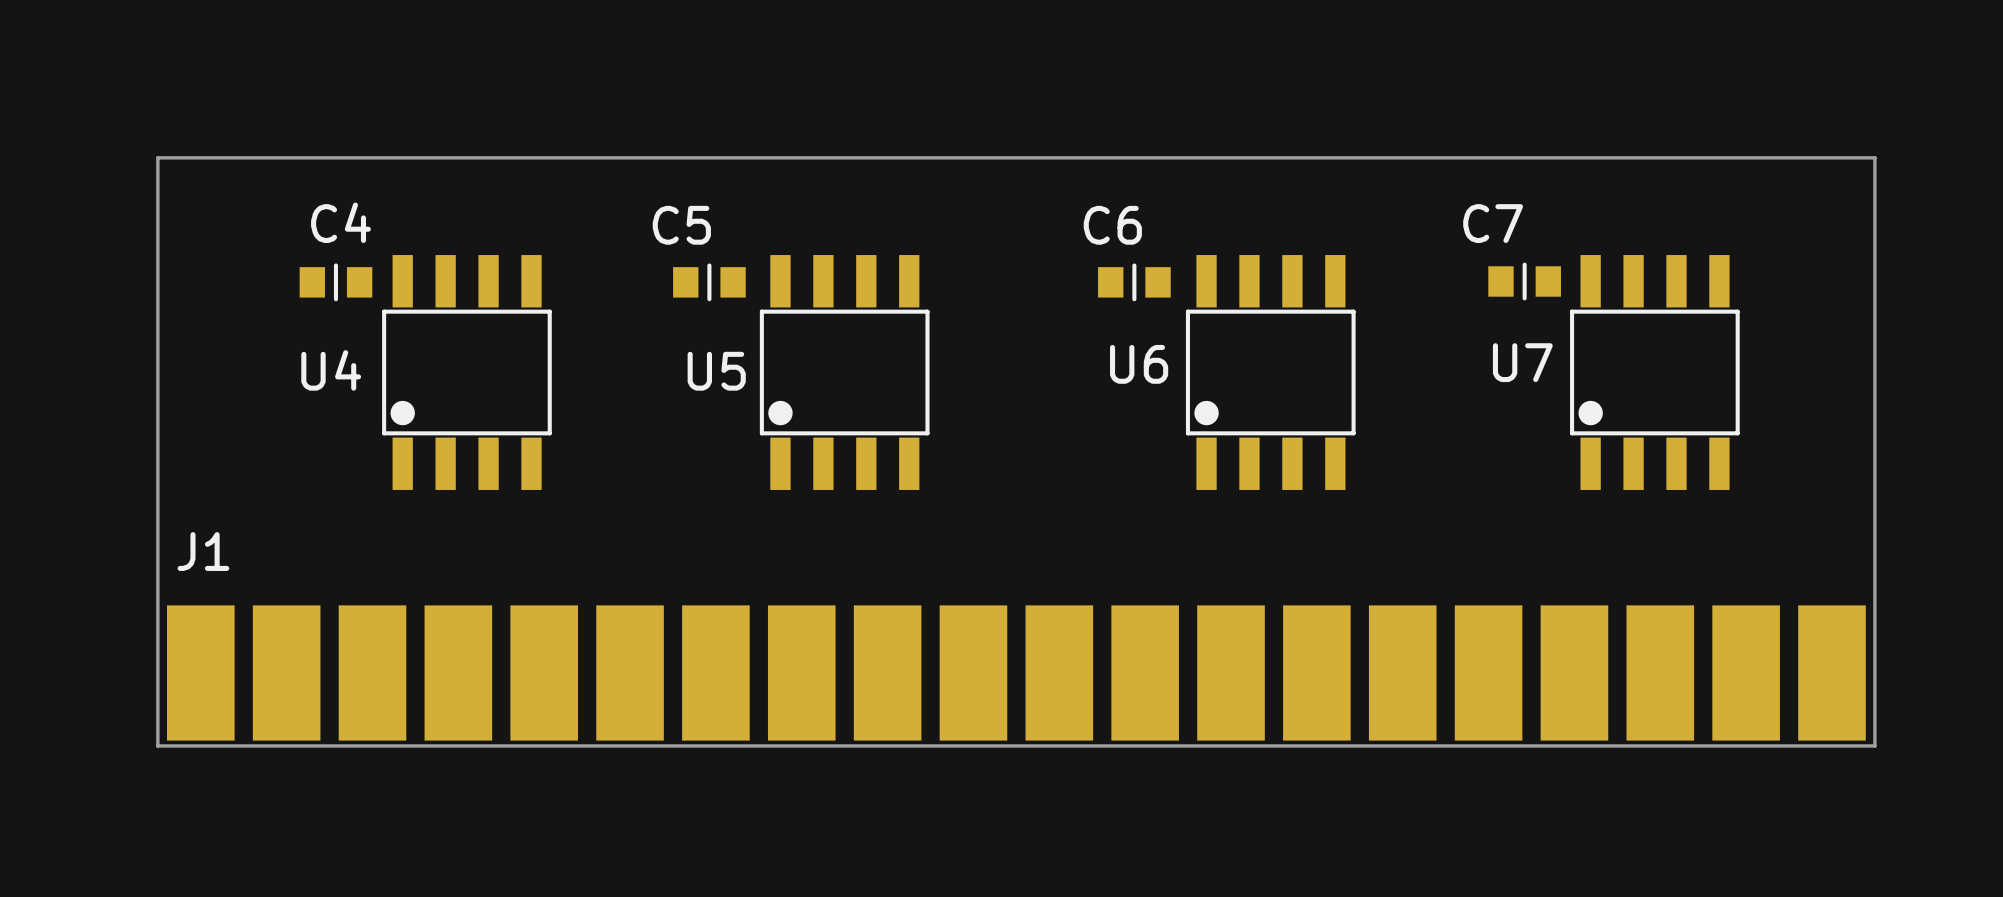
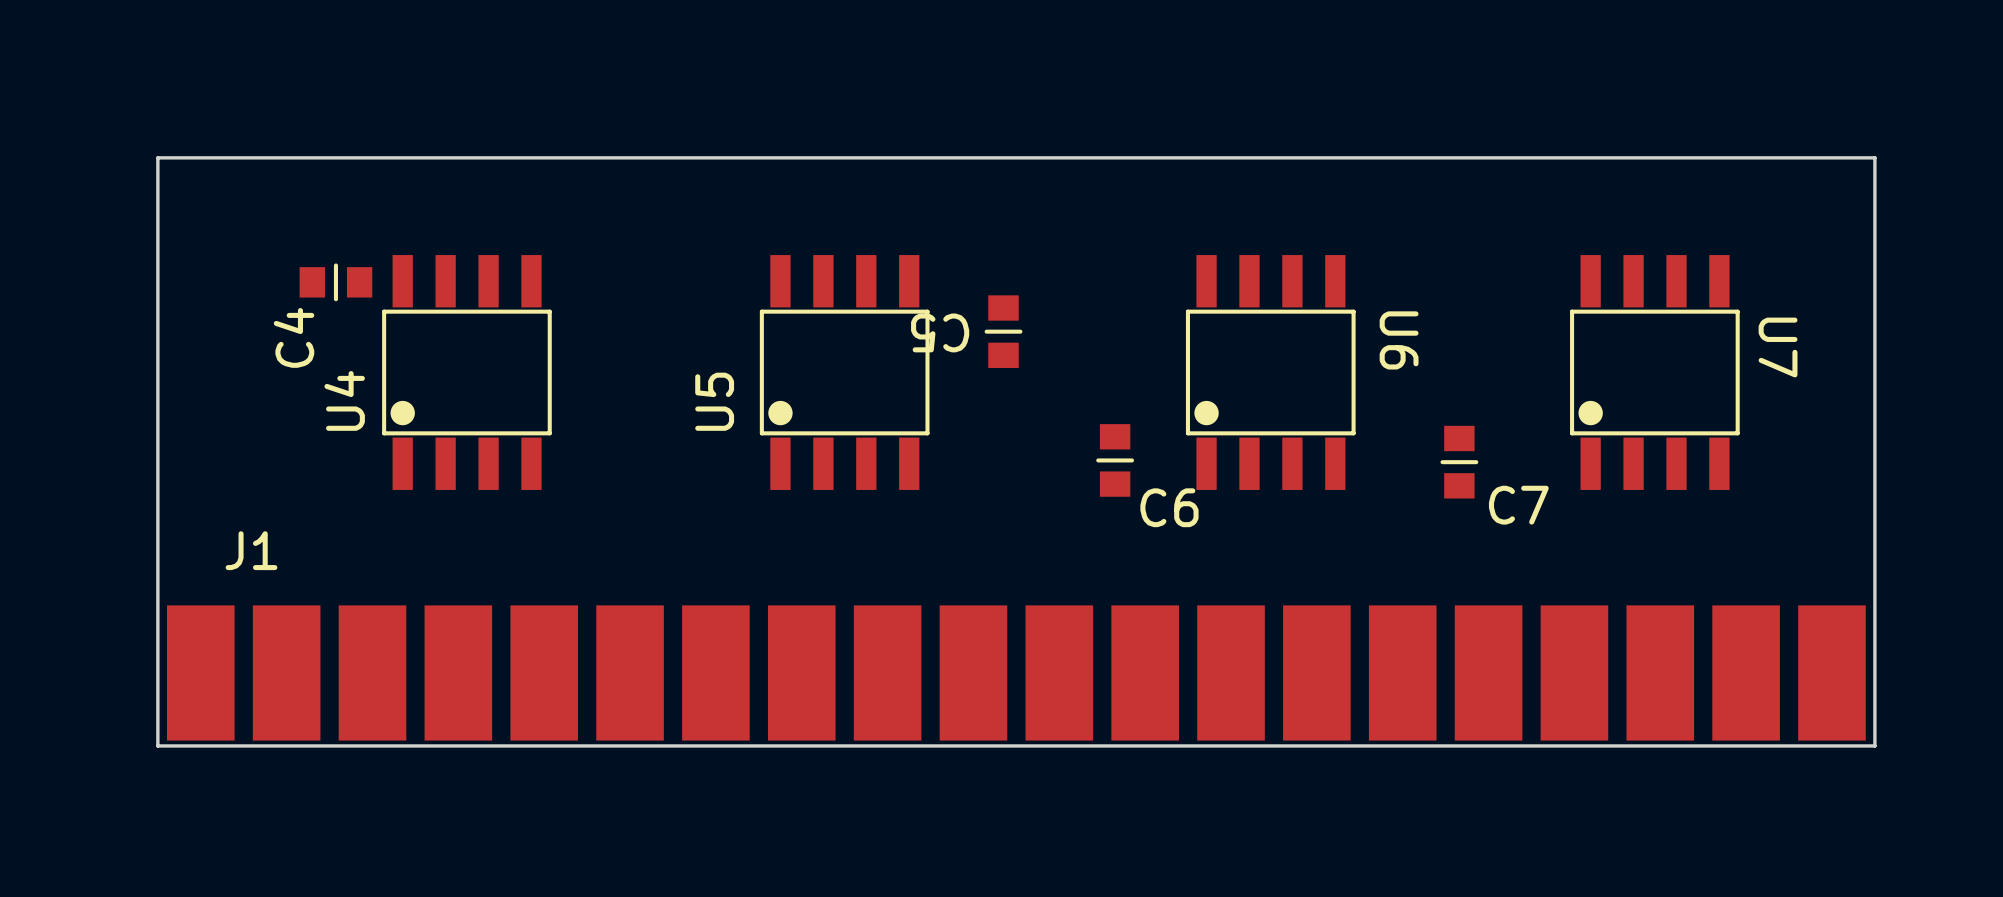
C4 name rotation: 0° (340, 222) -> 90° counterclockwise (294, 337)
C4 name position: C4 (340, 222) -> C4 (294, 337)
C7 name position: C7 (1493, 223) -> C7 (1518, 505)
C5 name position: C5 (681, 225) -> C5 (940, 332)
C7 rotation: 0° (1524, 281) -> 90° clockwise (1459, 462)
C7 position: (1524, 281) -> (1459, 462)
C5 rotation: 0° (709, 282) -> 90° clockwise (1003, 331)
C5 position: (709, 282) -> (1003, 331)
C6 rotation: 0° (1134, 282) -> 90° clockwise (1115, 460)
C6 position: (1134, 282) -> (1115, 460)
U7 name rotation: 0° (1522, 362) -> 90° clockwise (1778, 347)
U7 name position: U7 (1522, 362) -> U7 (1778, 347)
U6 name rotation: 0° (1139, 364) -> 90° clockwise (1399, 340)
U6 name position: U6 (1139, 364) -> U6 (1399, 340)
U4 name rotation: 0° (331, 370) -> 90° counterclockwise (344, 400)
U5 name rotation: 0° (716, 371) -> 90° counterclockwise (714, 401)
J1 name position: J1 (203, 551) -> J1 (251, 550)

